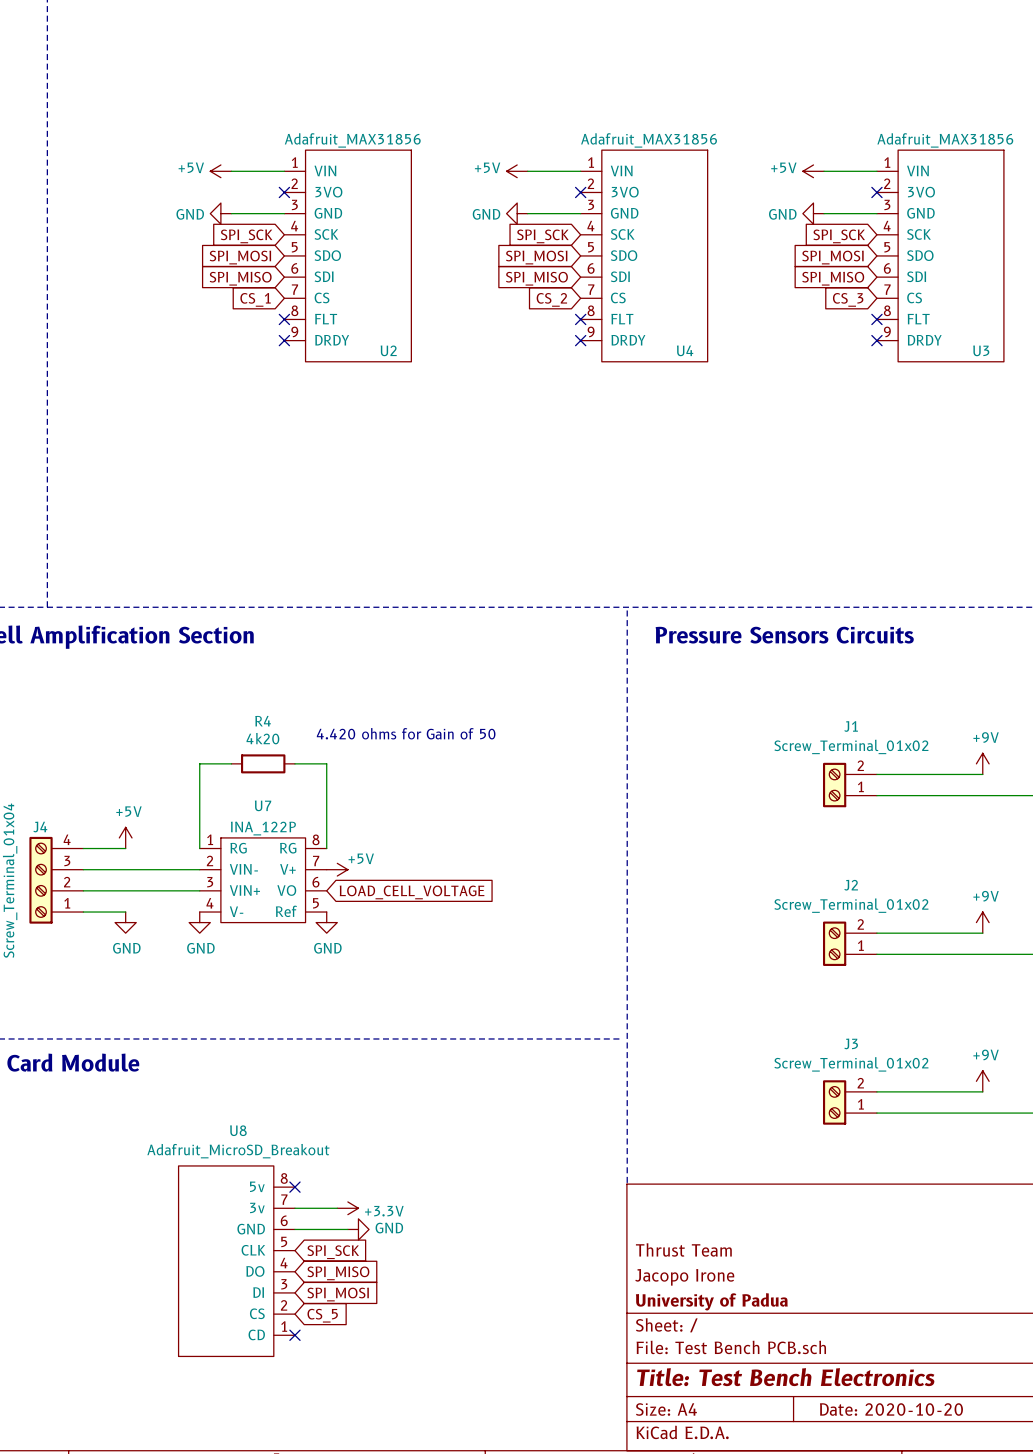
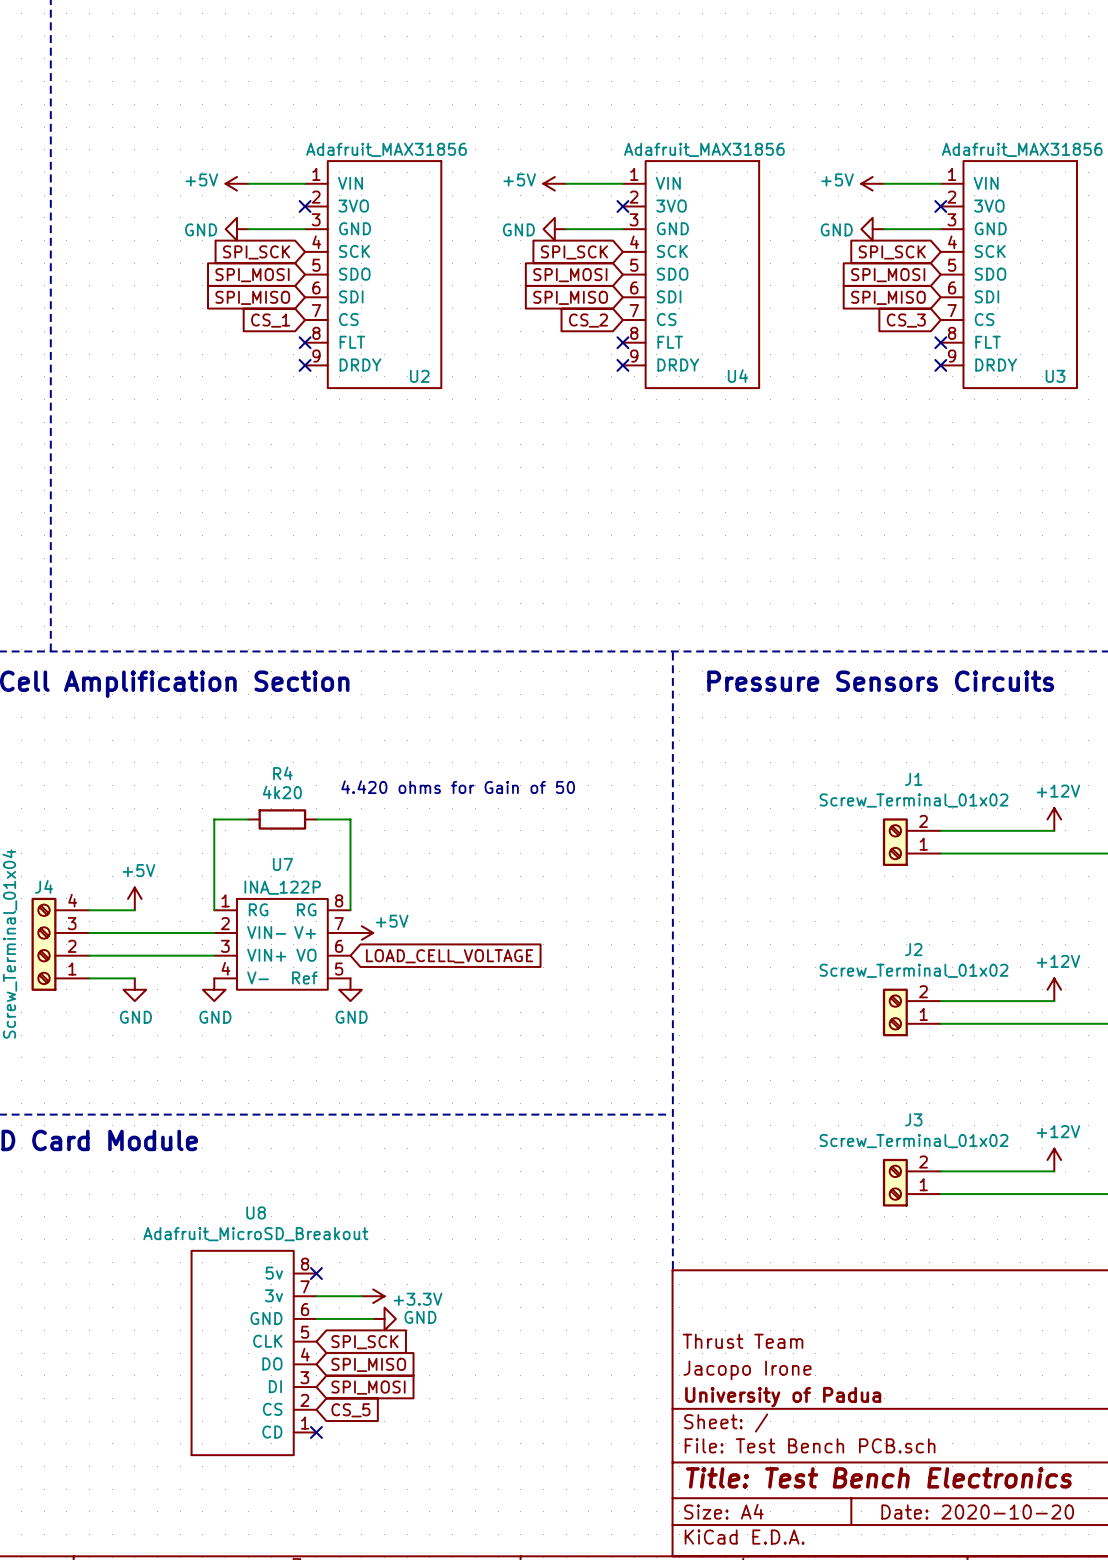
power symbol: +9V (982, 763) -> +12V (1054, 819)
power symbol: +9V (982, 922) -> +12V (1054, 989)
power symbol: +9V (982, 1081) -> +12V (1054, 1160)

